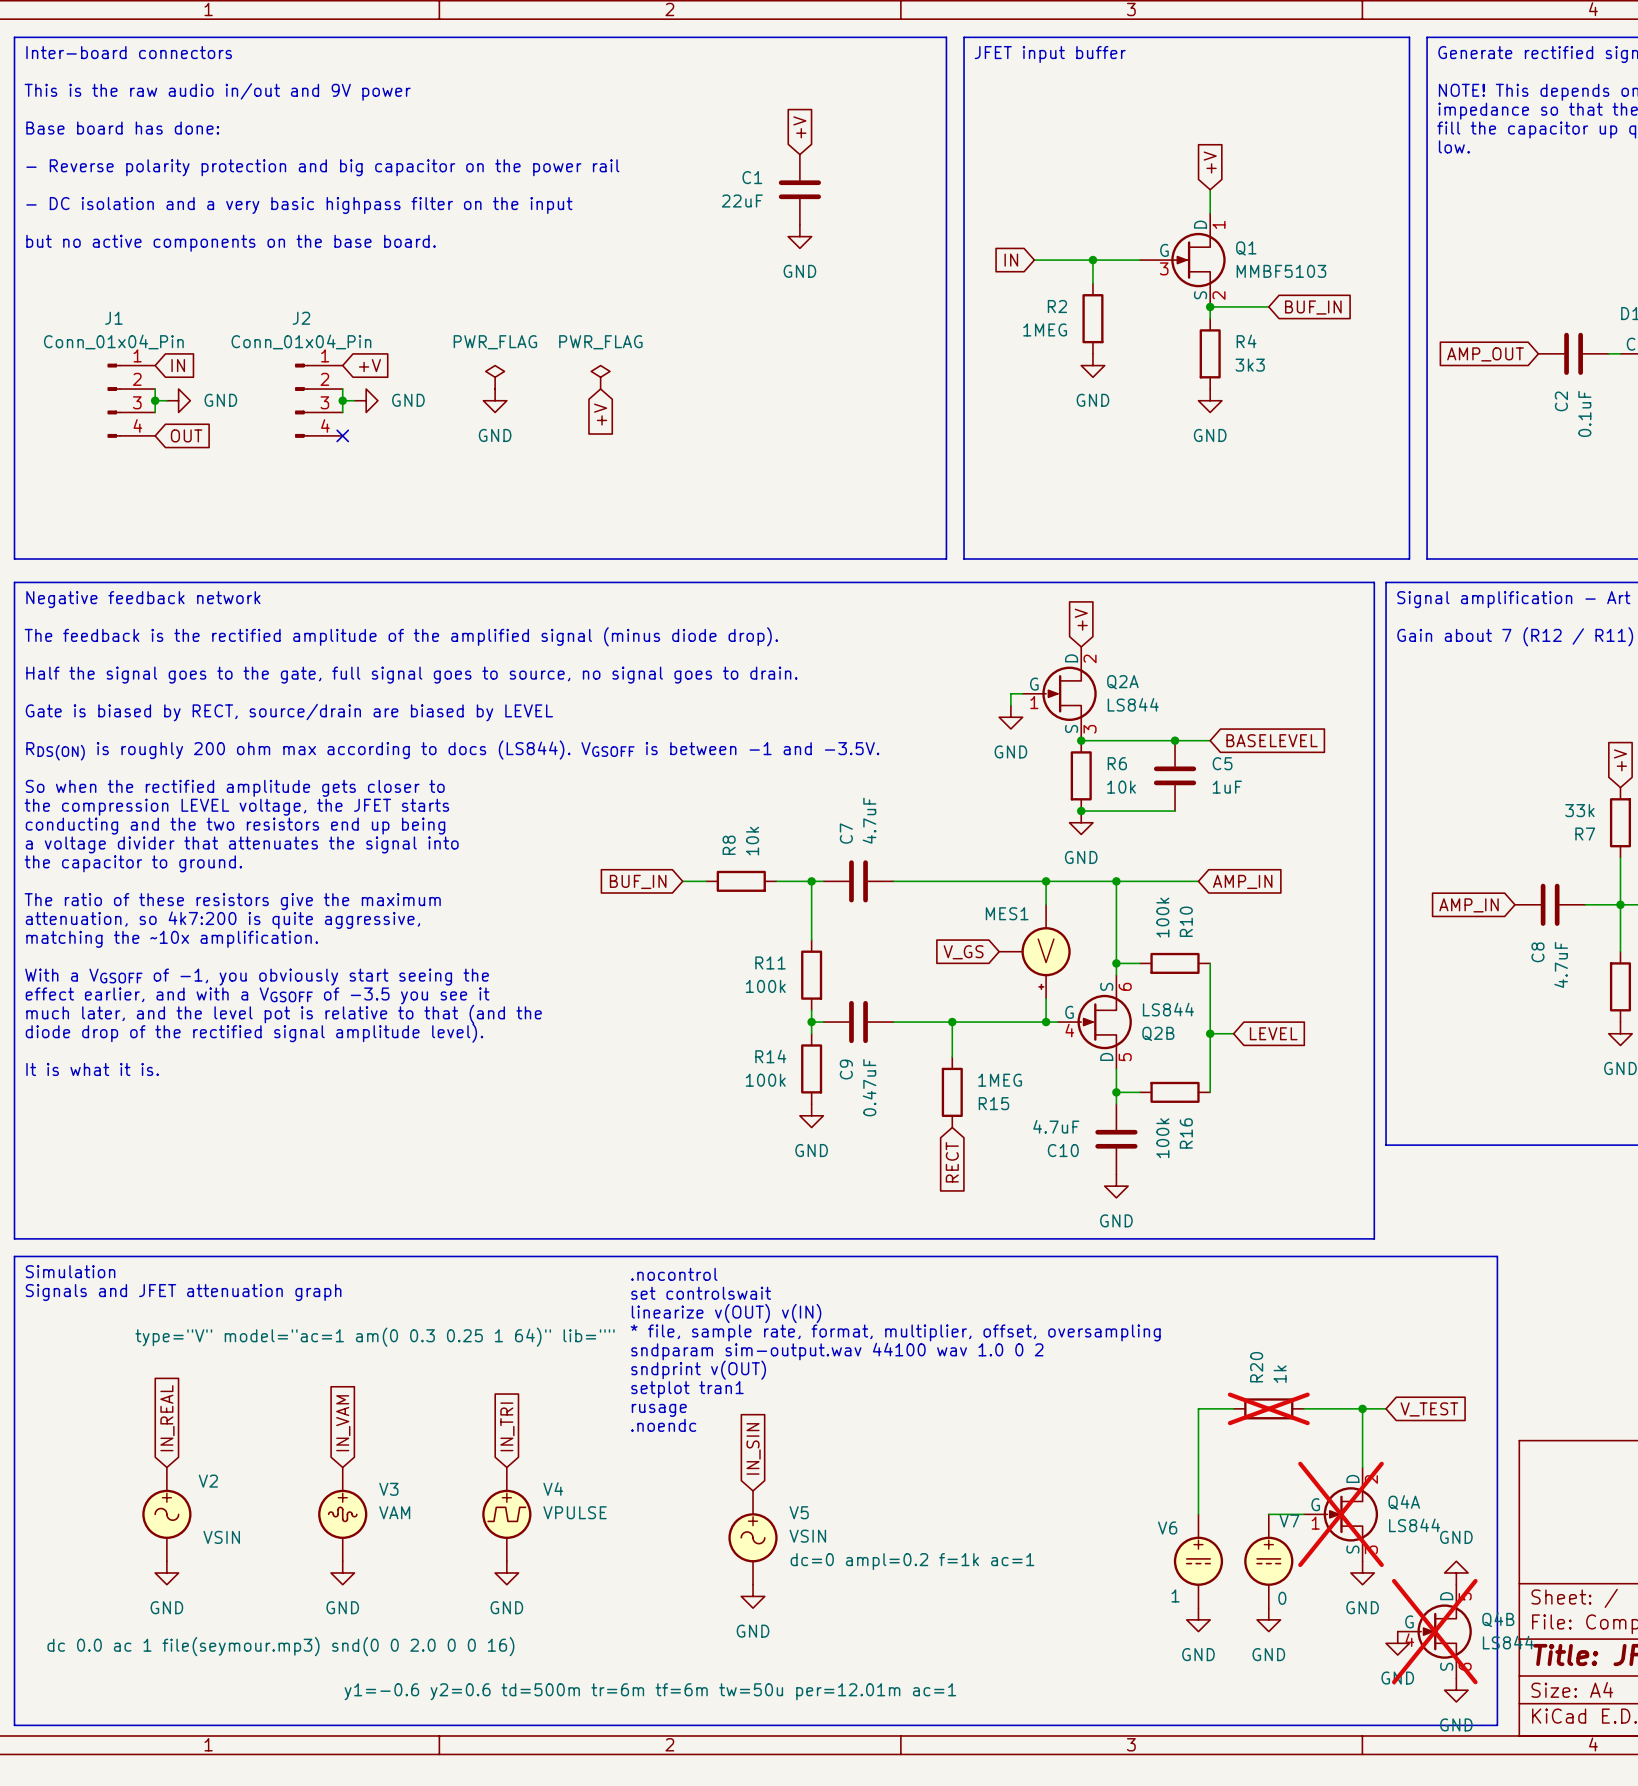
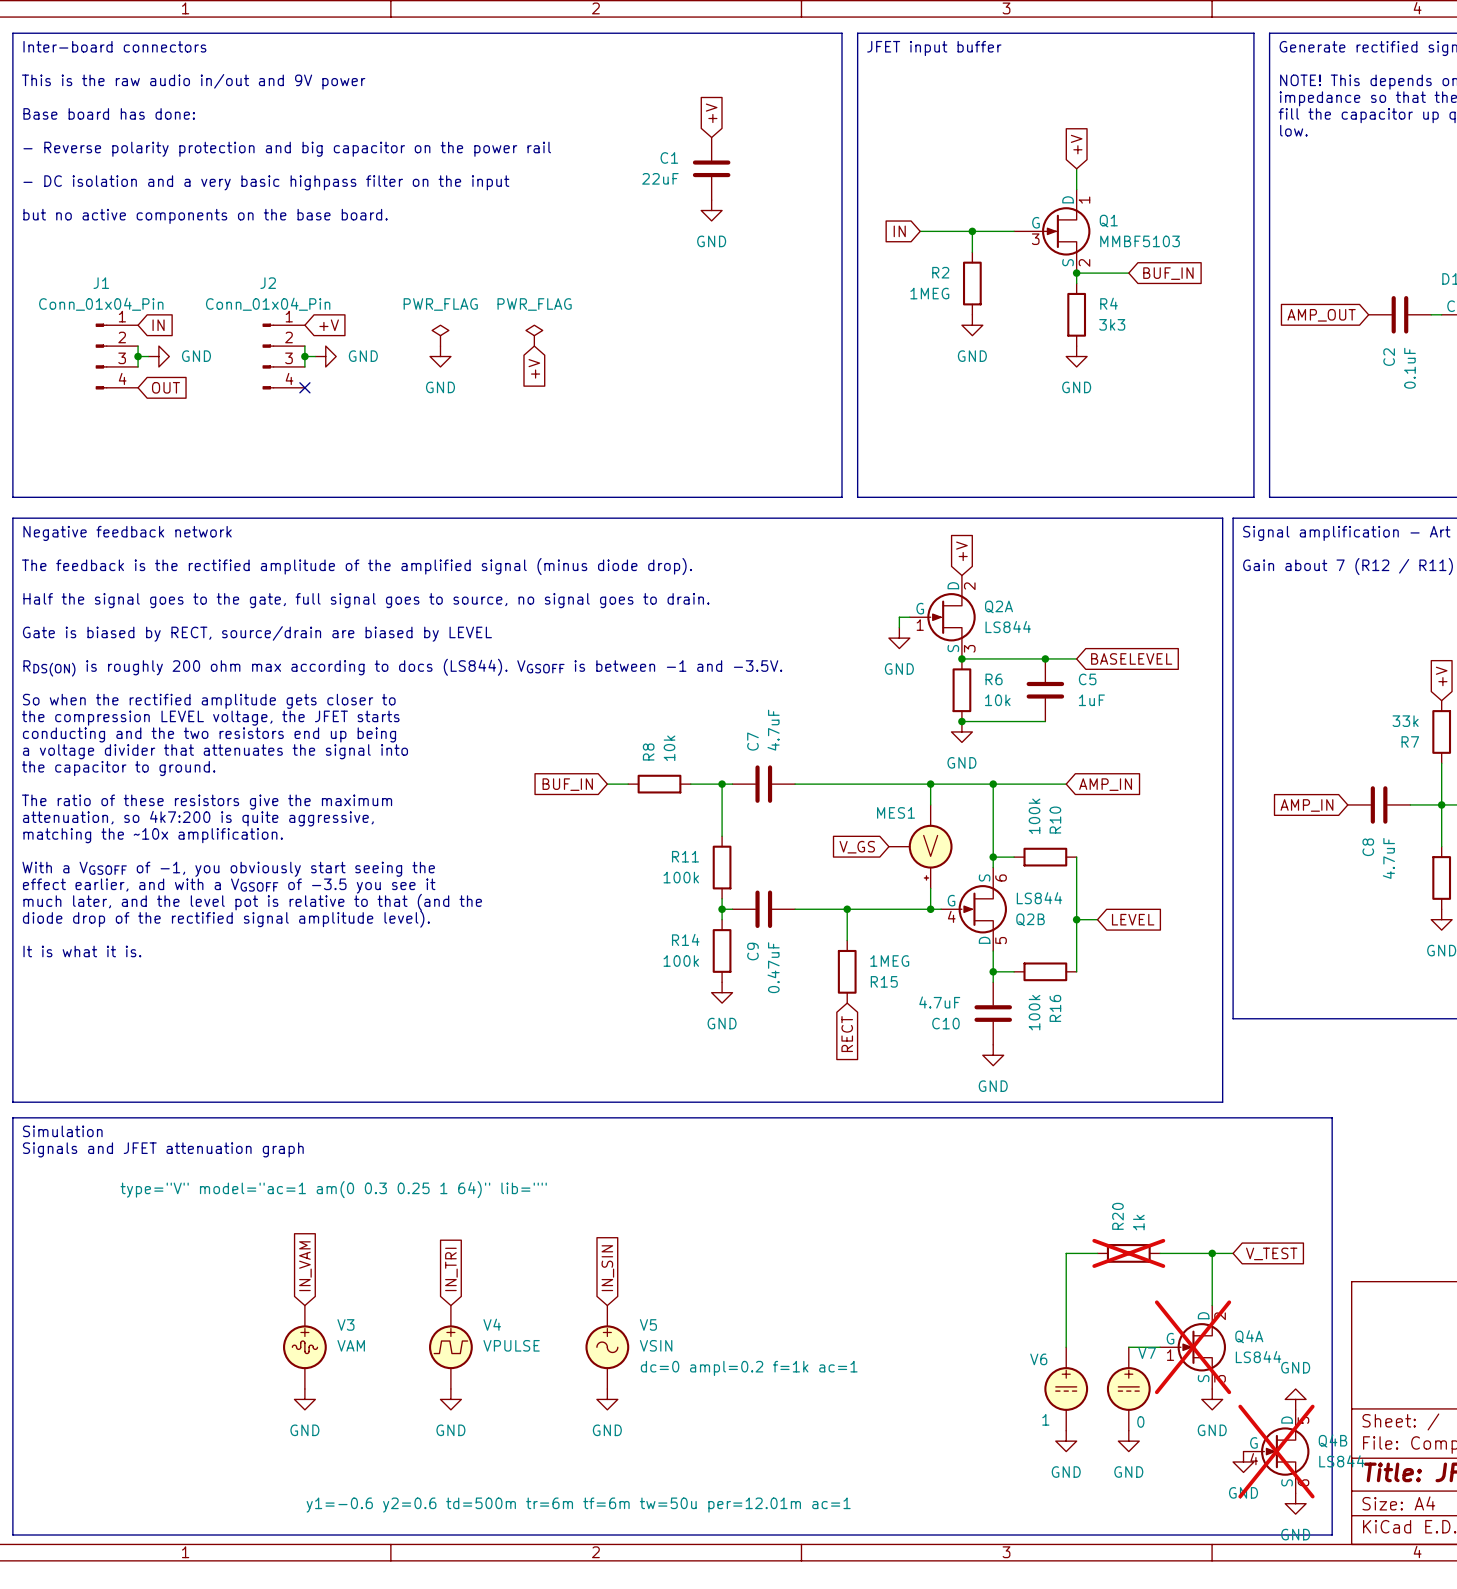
text: .nocontrol (674, 1274) -> none
text: set controlswait (701, 1293) -> none
text: linearize v(OUT) v(IN) (726, 1313) -> none
text: * file, sample rate, format, multiplier, offset, oversampling (895, 1332) -> none
text: sndparam sim-output.wav 44100 wav 1.0 0 2 (837, 1351) -> none
text: sndprint v(OUT) (698, 1370) -> none
text: setplot tran1 (687, 1389) -> none
text: rusage (659, 1410) -> none
global label: IN_REAL (167, 1418) -> none
text: .noendc (663, 1425) -> none
global label position: IN_SIN (753, 1448) -> IN_SIN (607, 1268)
V2: VSIN (166, 1514) -> none
V5 position: (753, 1537) -> (607, 1347)
power symbol: GND (166, 1572) -> none
power symbol position: GND (753, 1596) -> GND (607, 1399)

